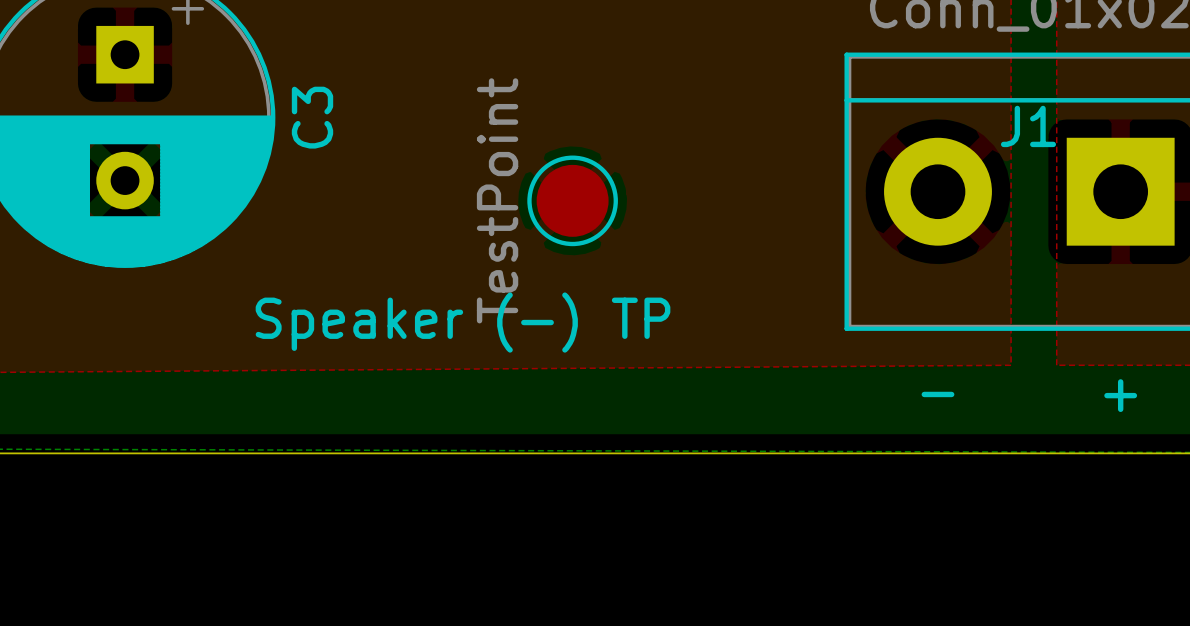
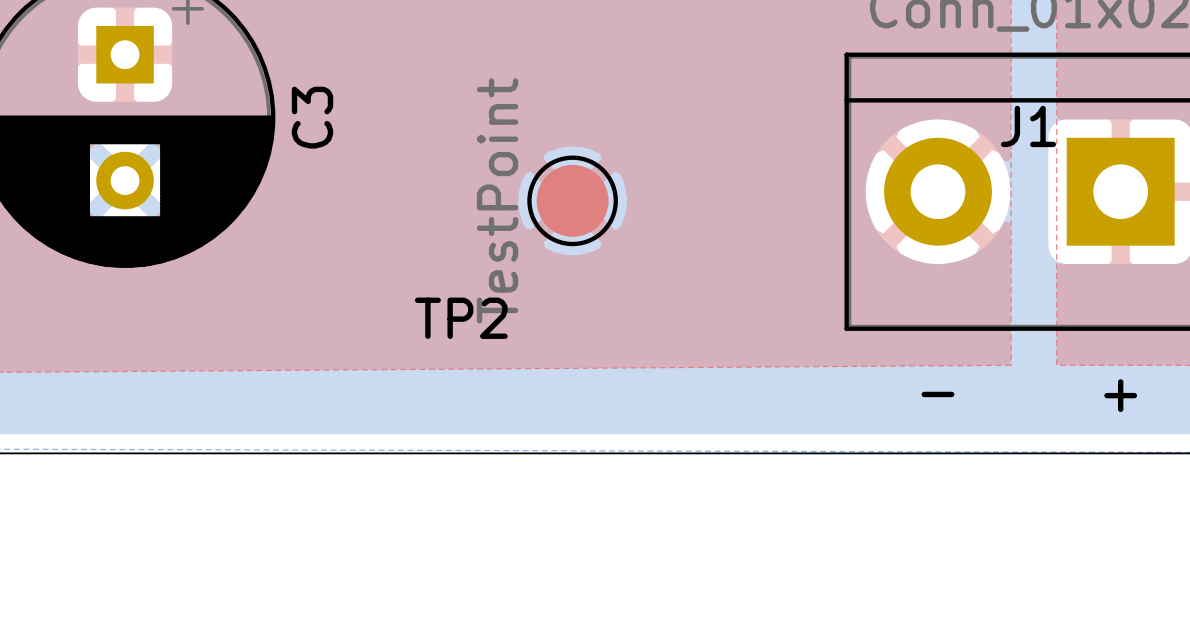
Speaker (-) TP name: Speaker (-) TP (463, 322) -> TP2 (461, 318)

